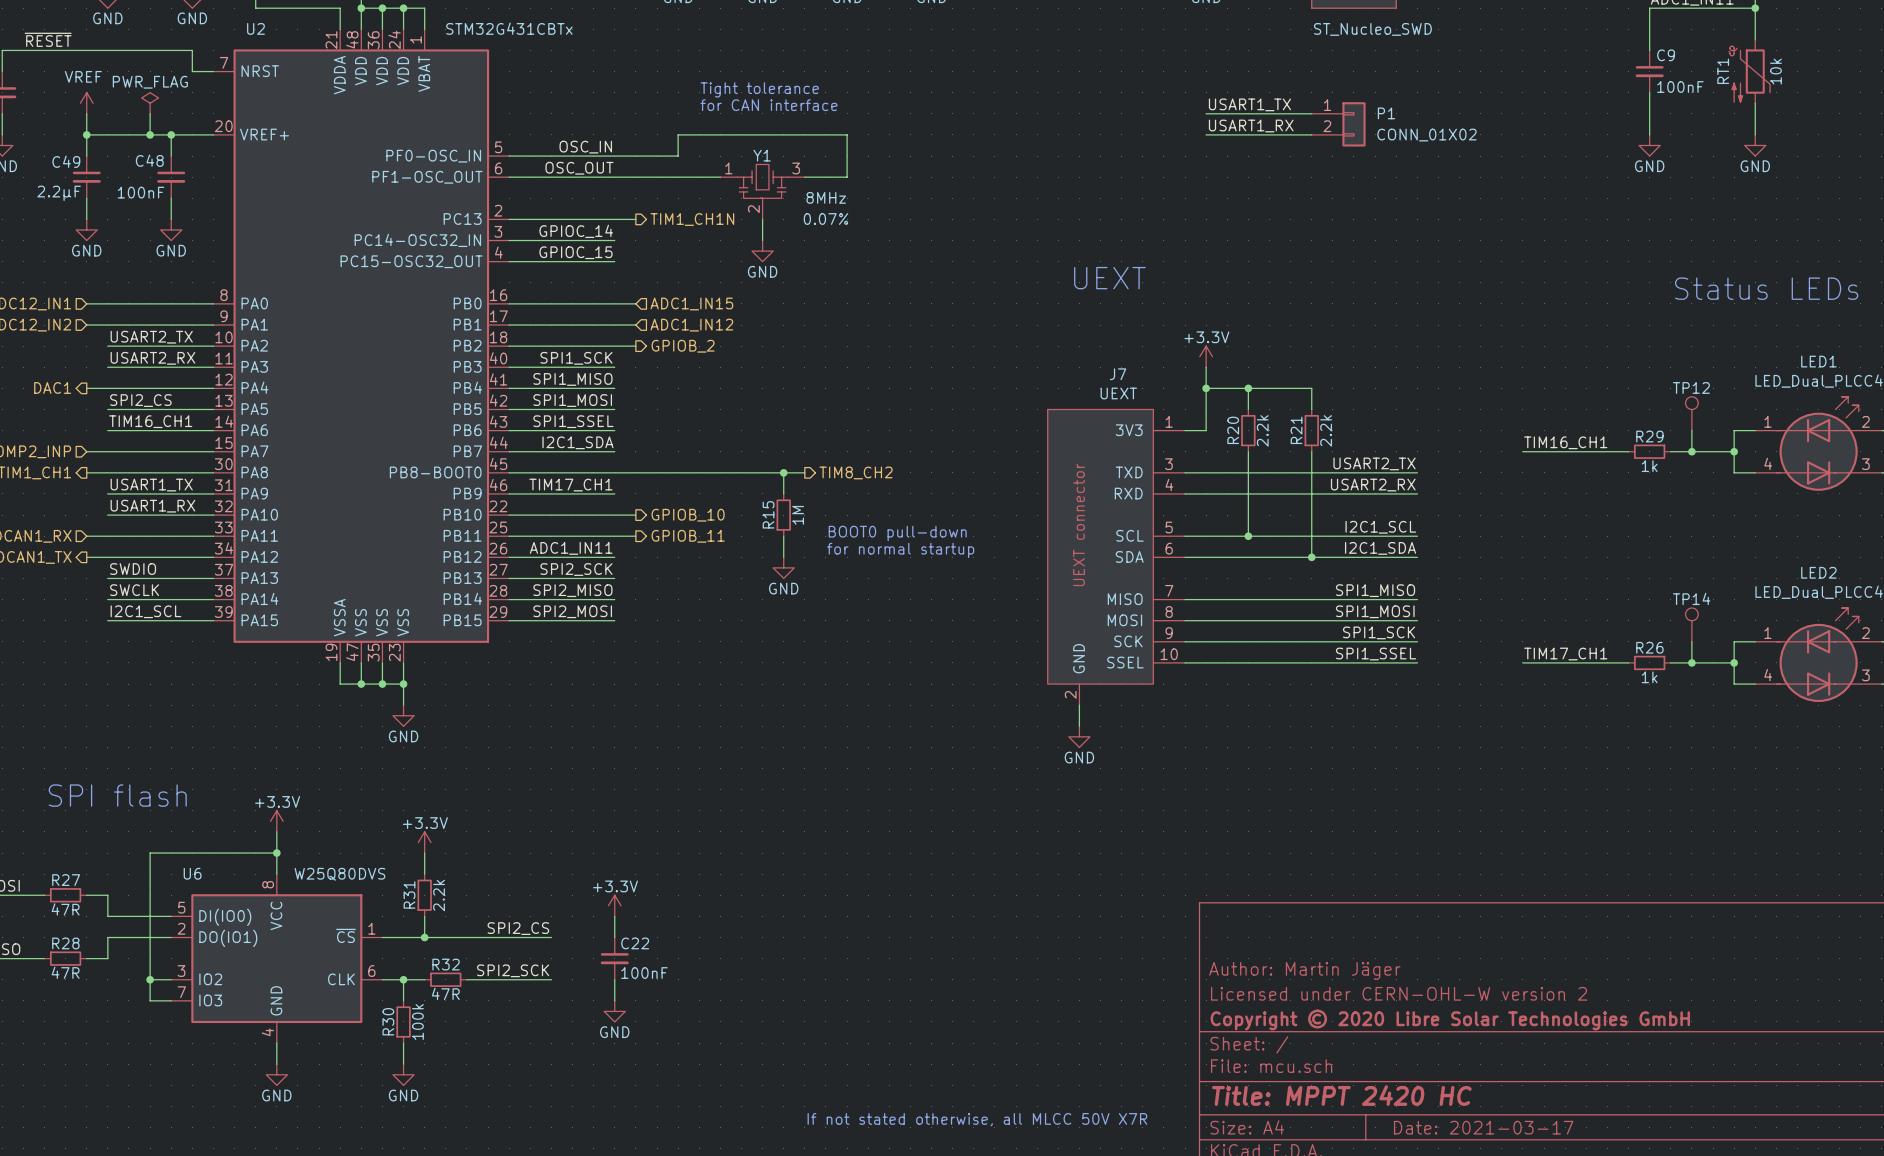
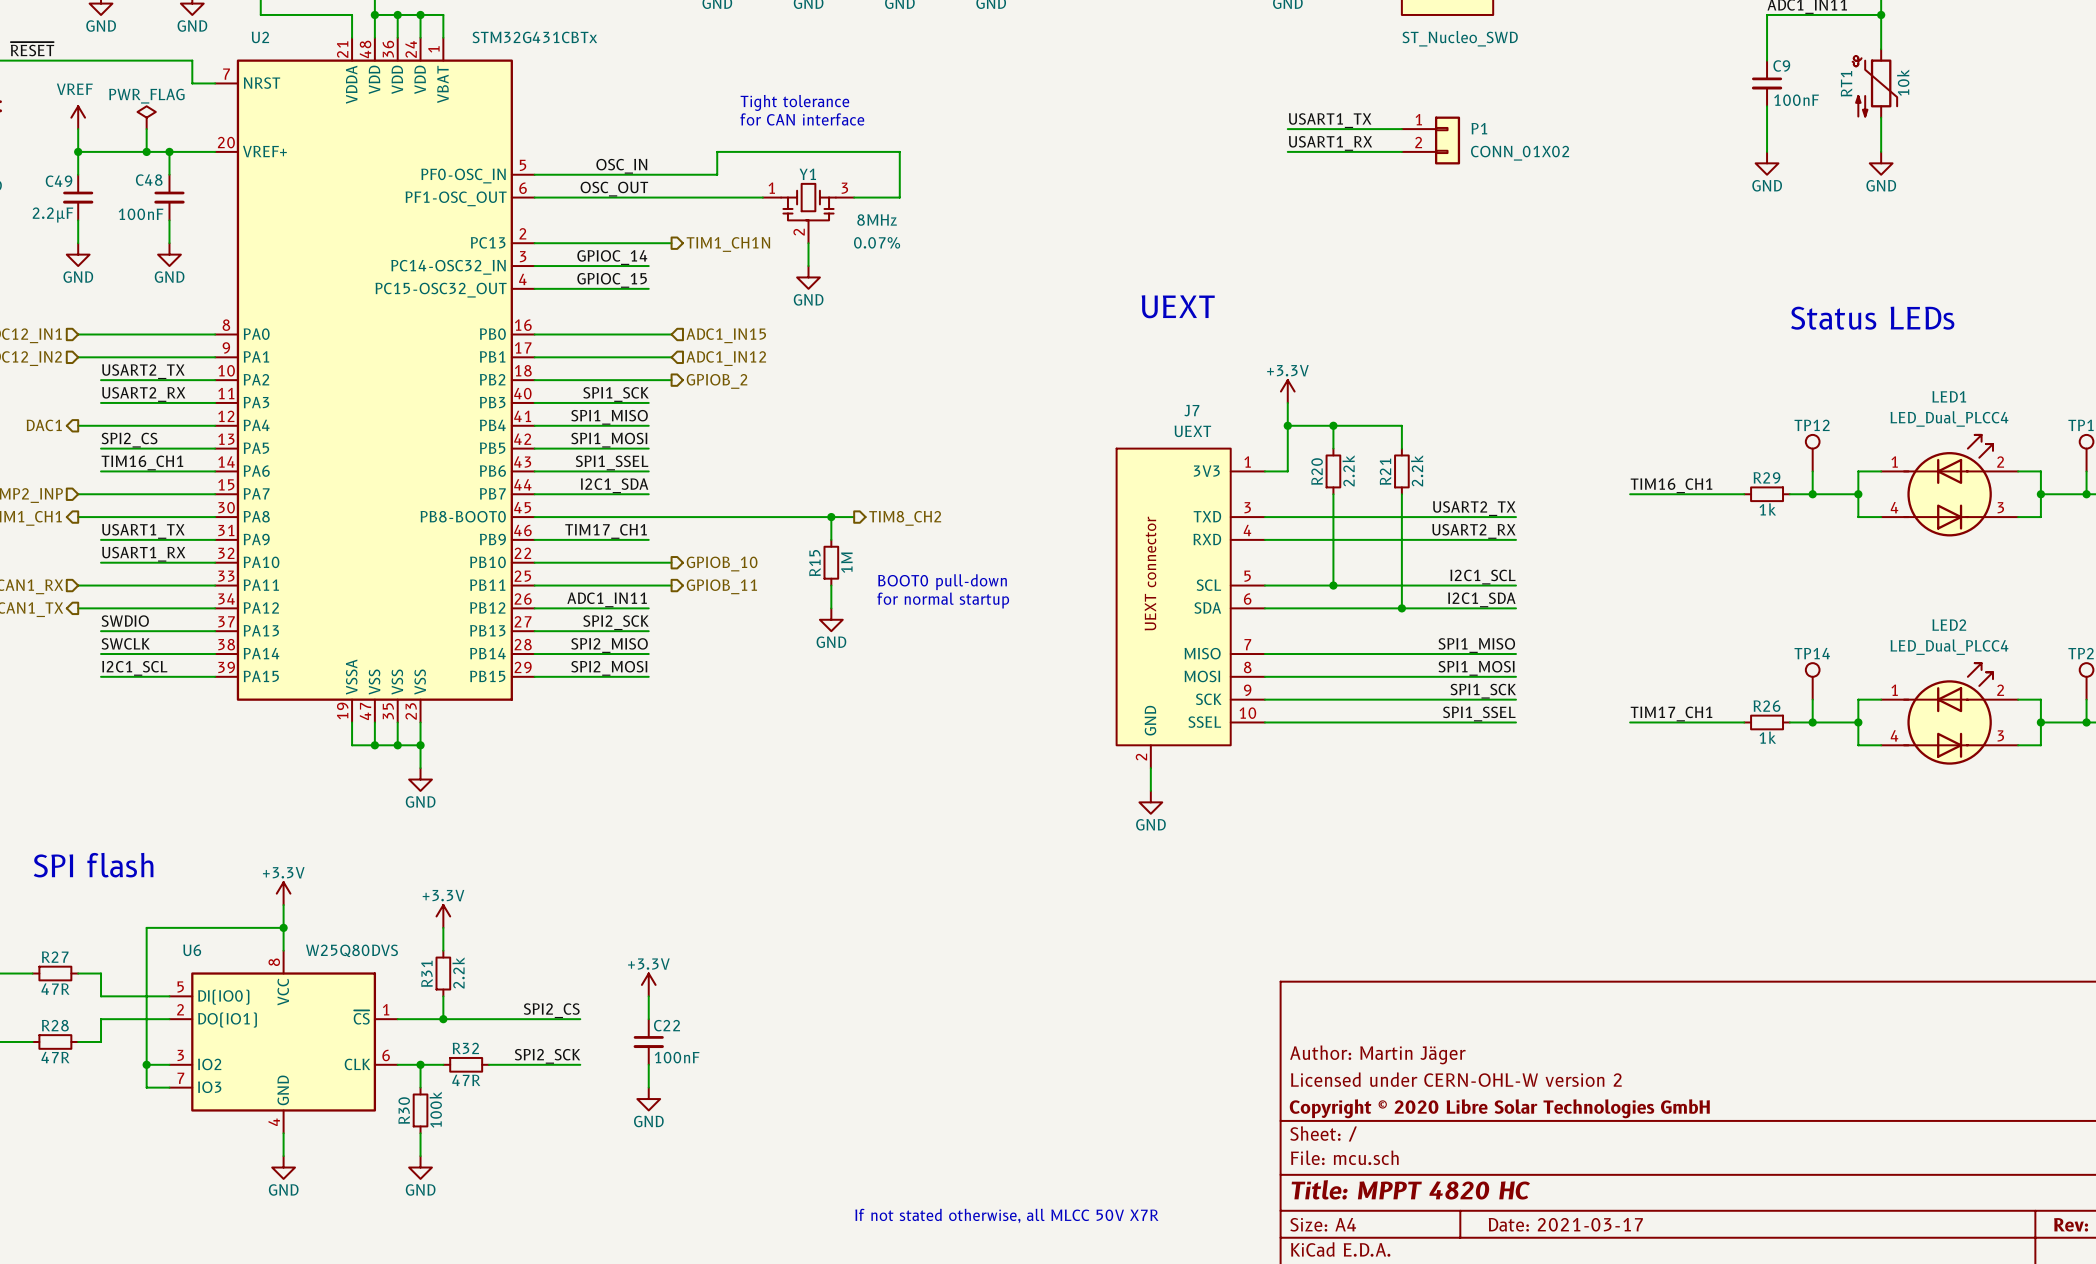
title block: Title: MPPT 2420 HC (1341, 1095) -> Title: MPPT 4820 HC (1410, 1189)

